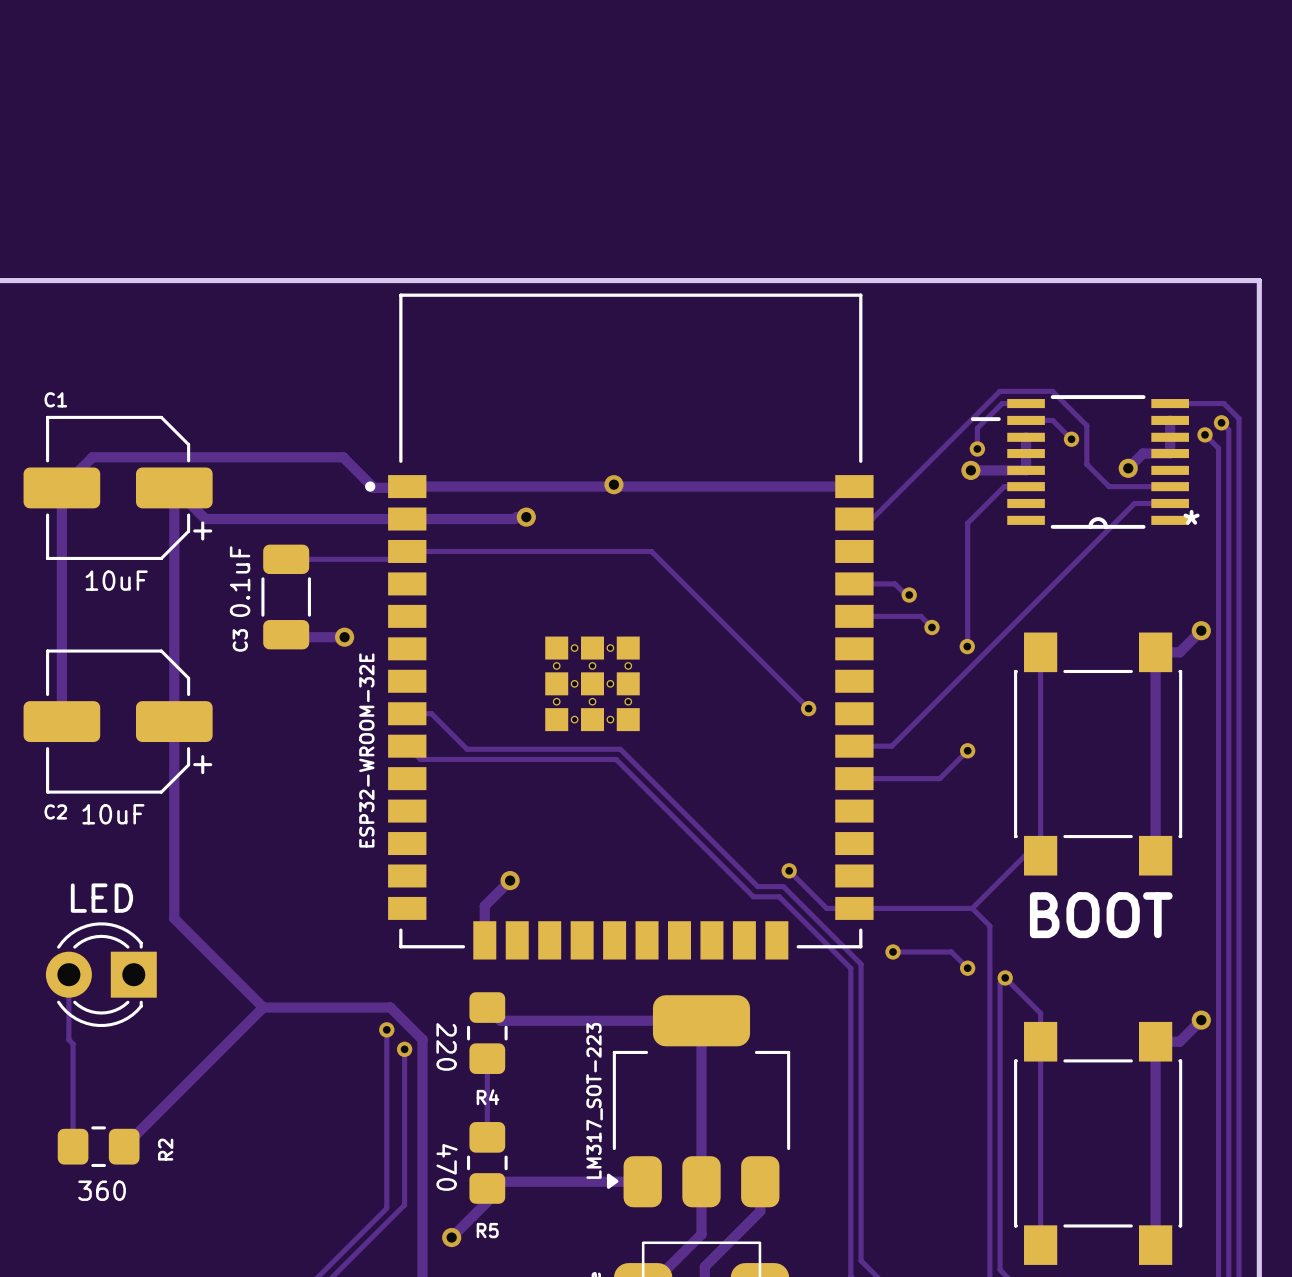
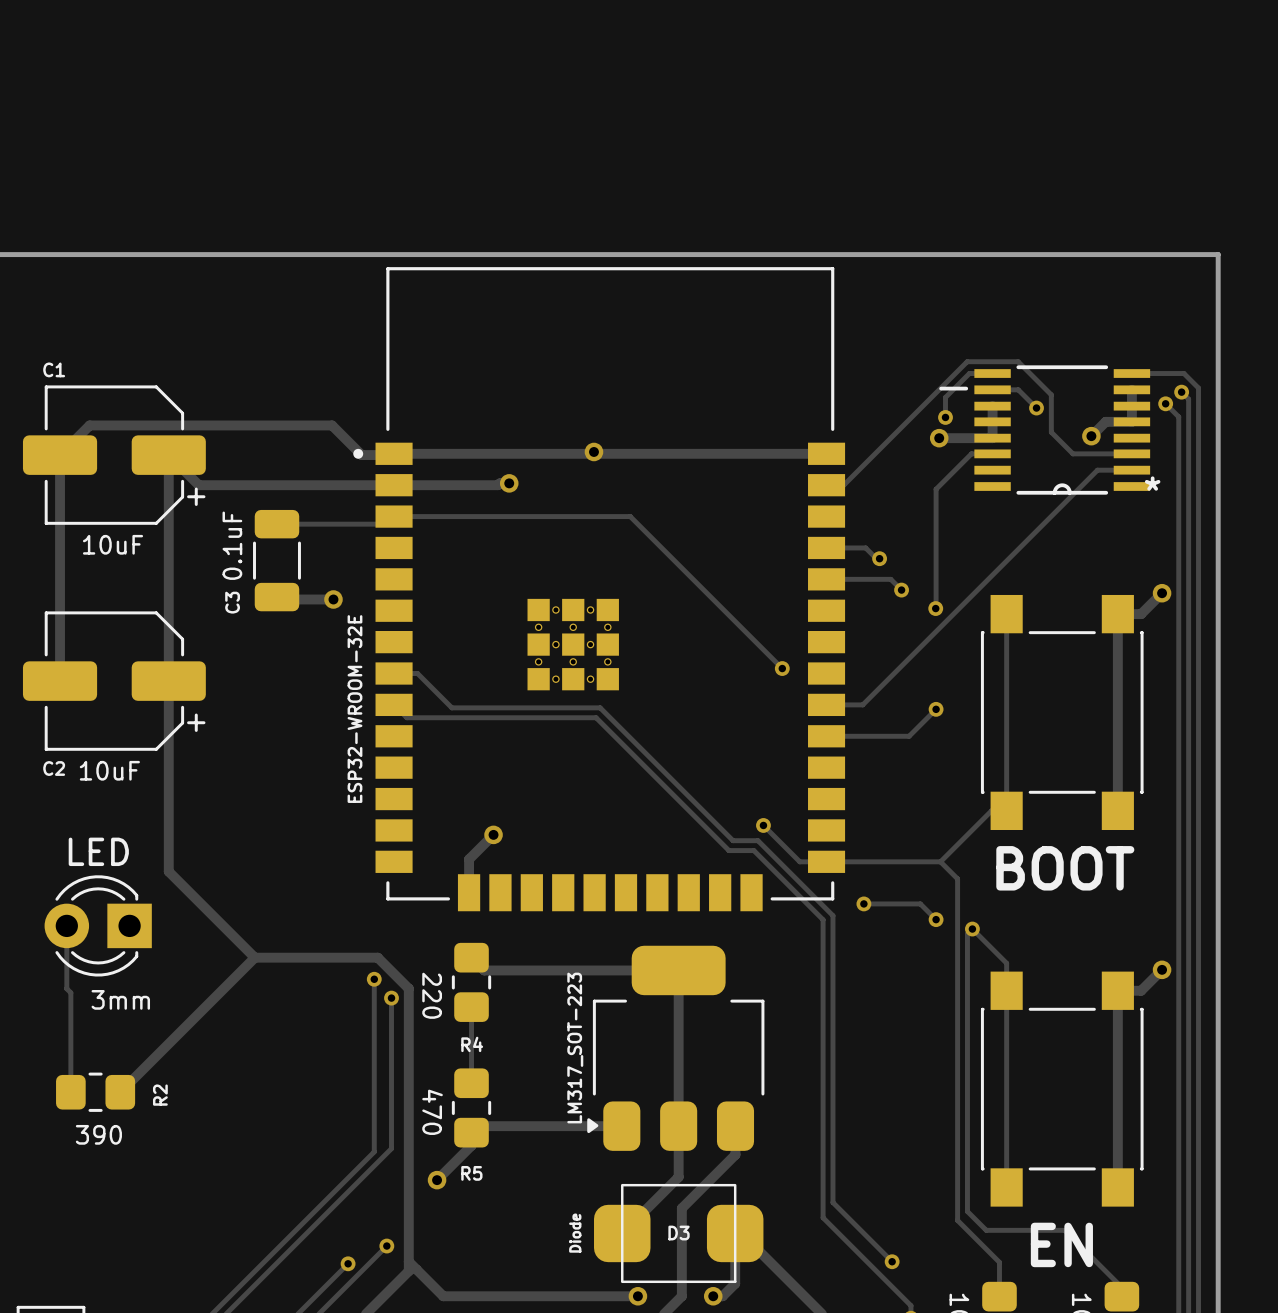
text: none -> 3mm (120, 999)
text: 360 (102, 1190) -> 390 (98, 1134)

